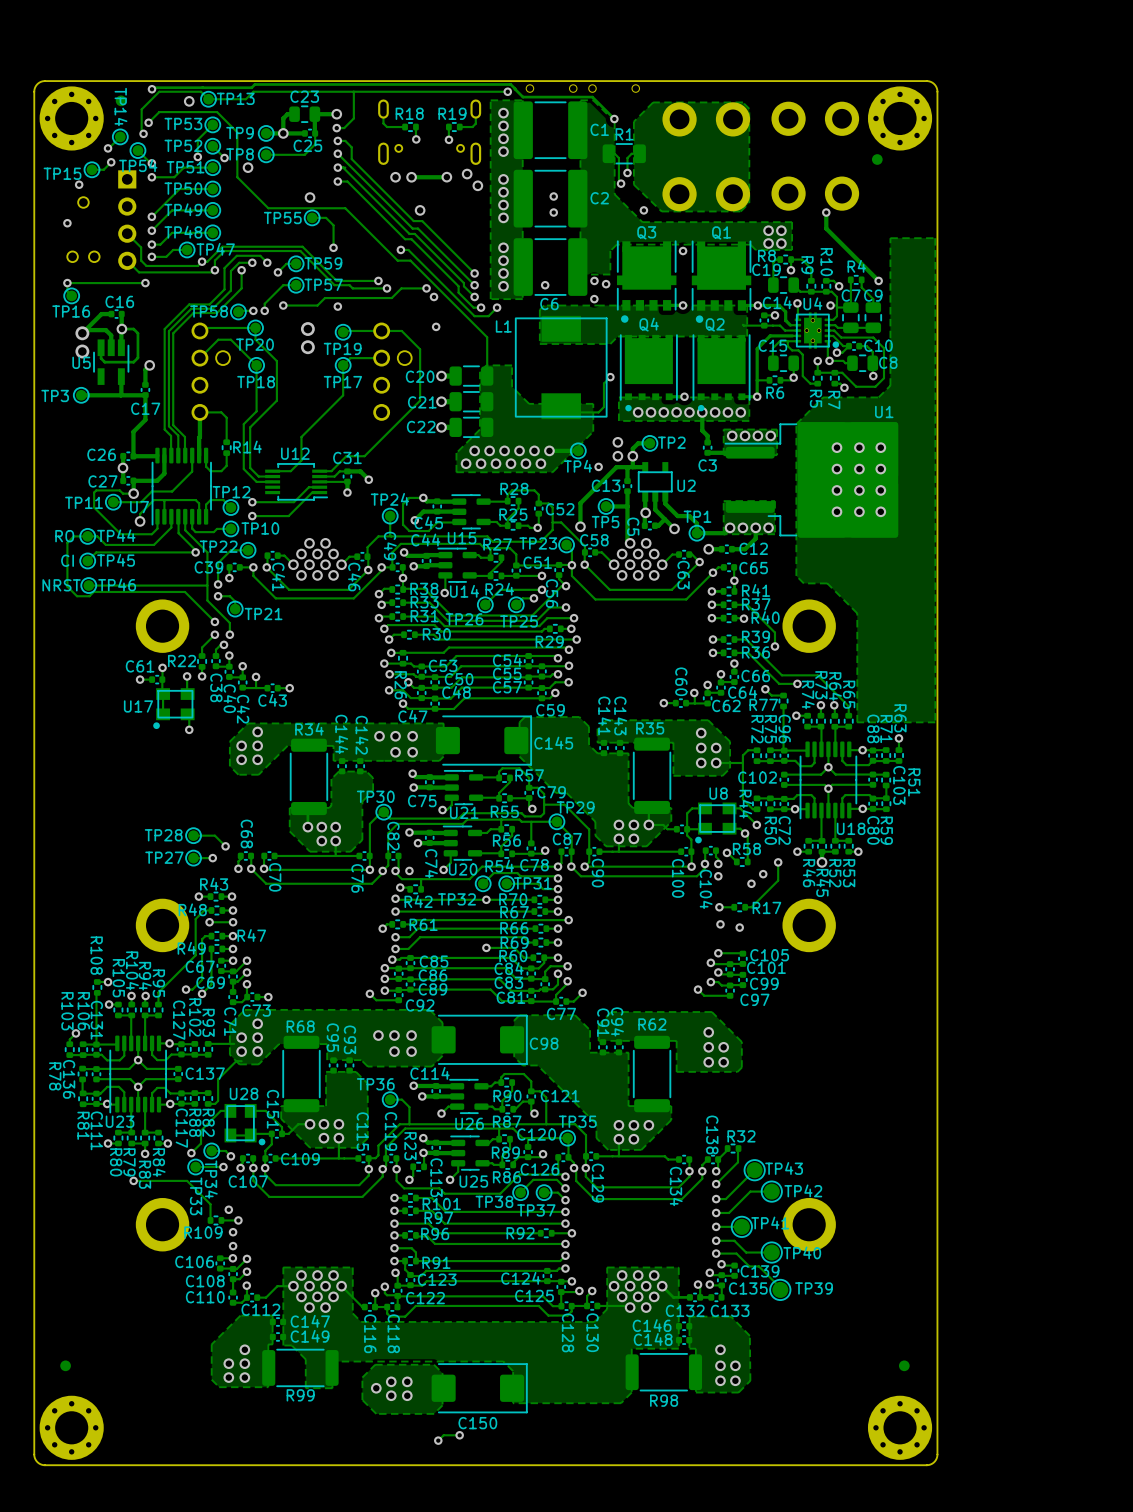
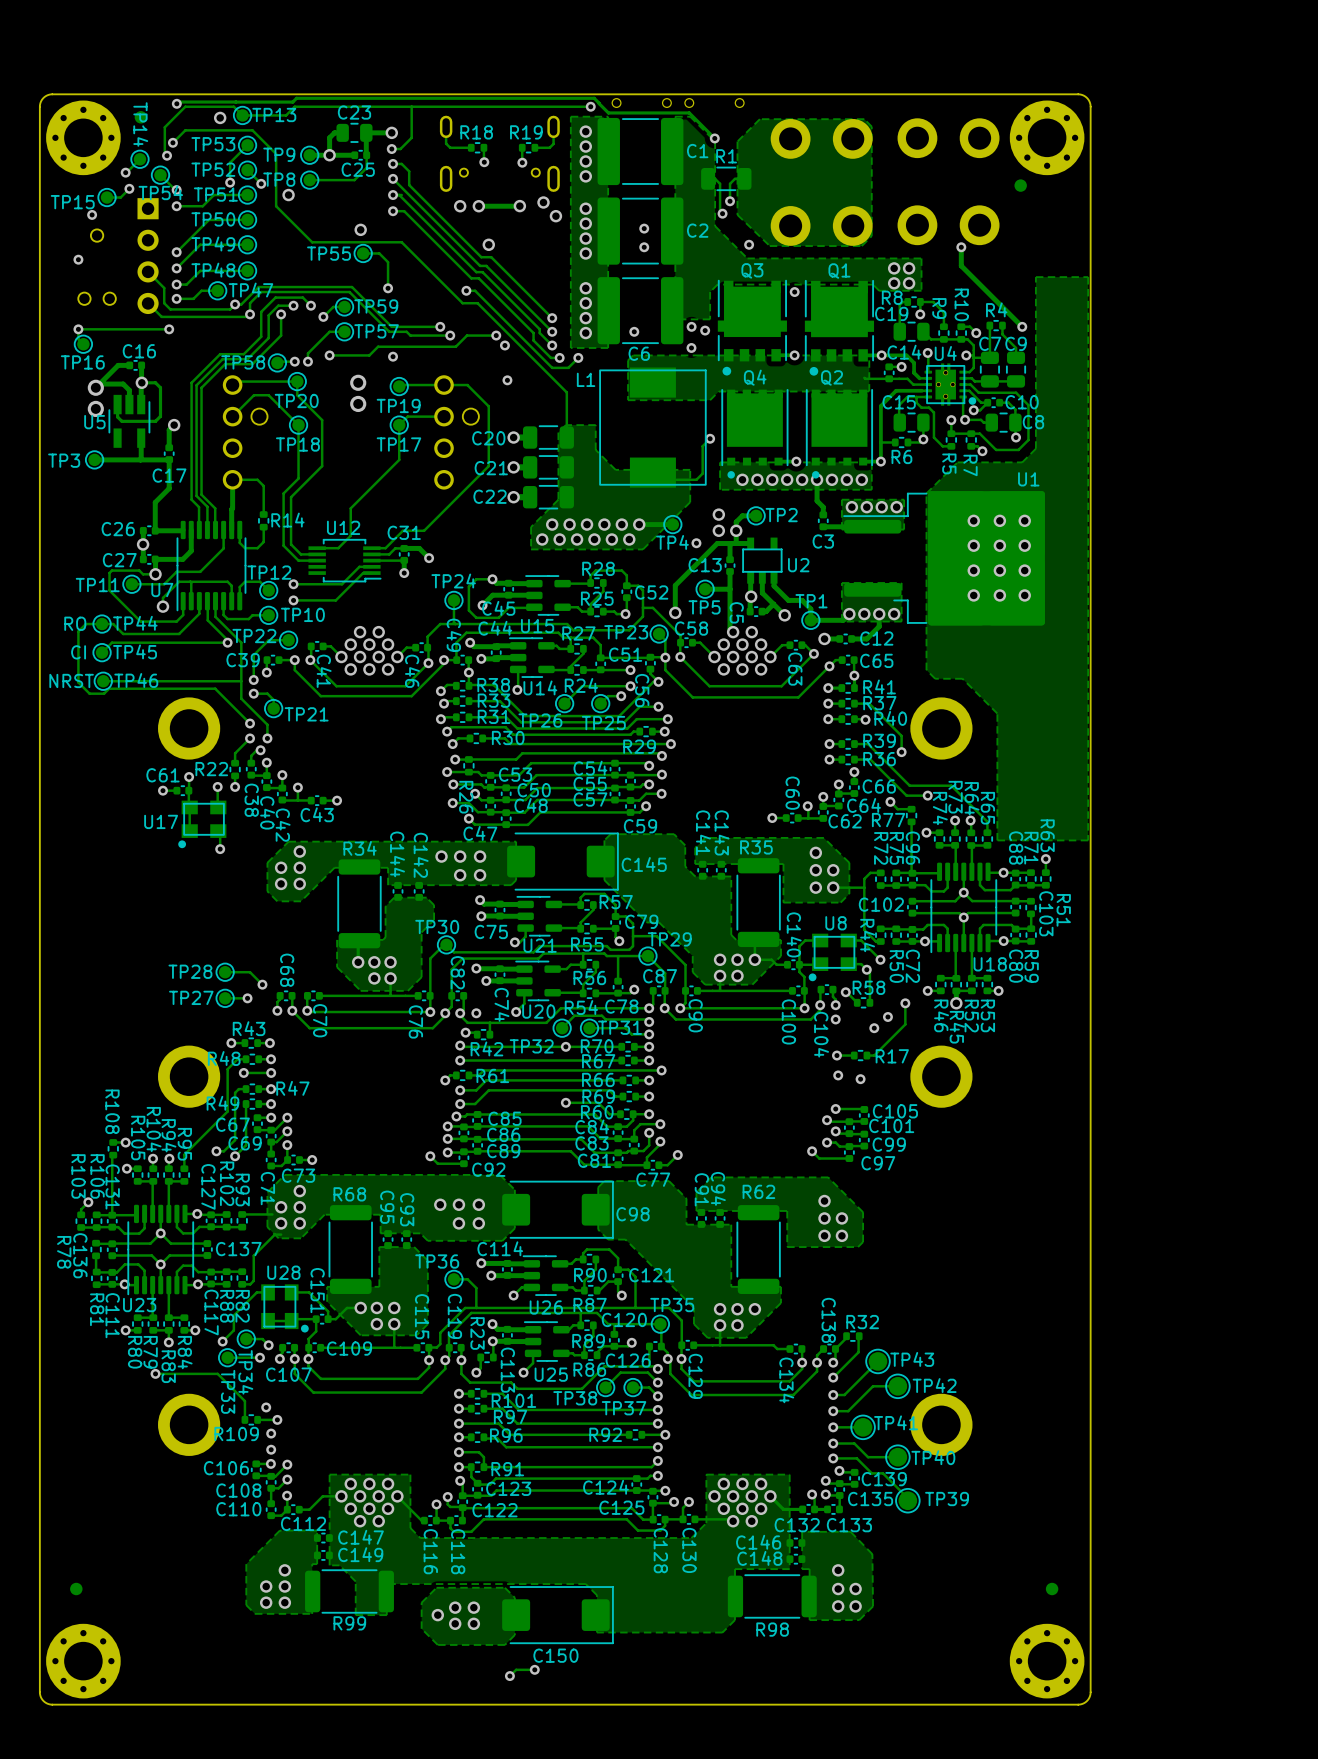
C140 name: none -> C140 (794, 934)

